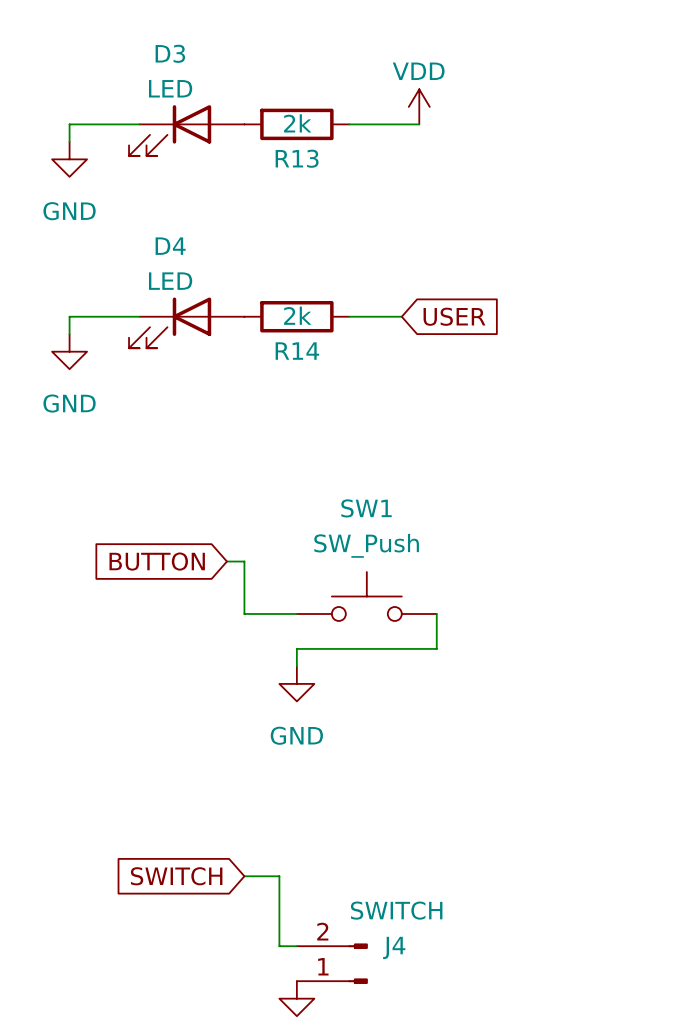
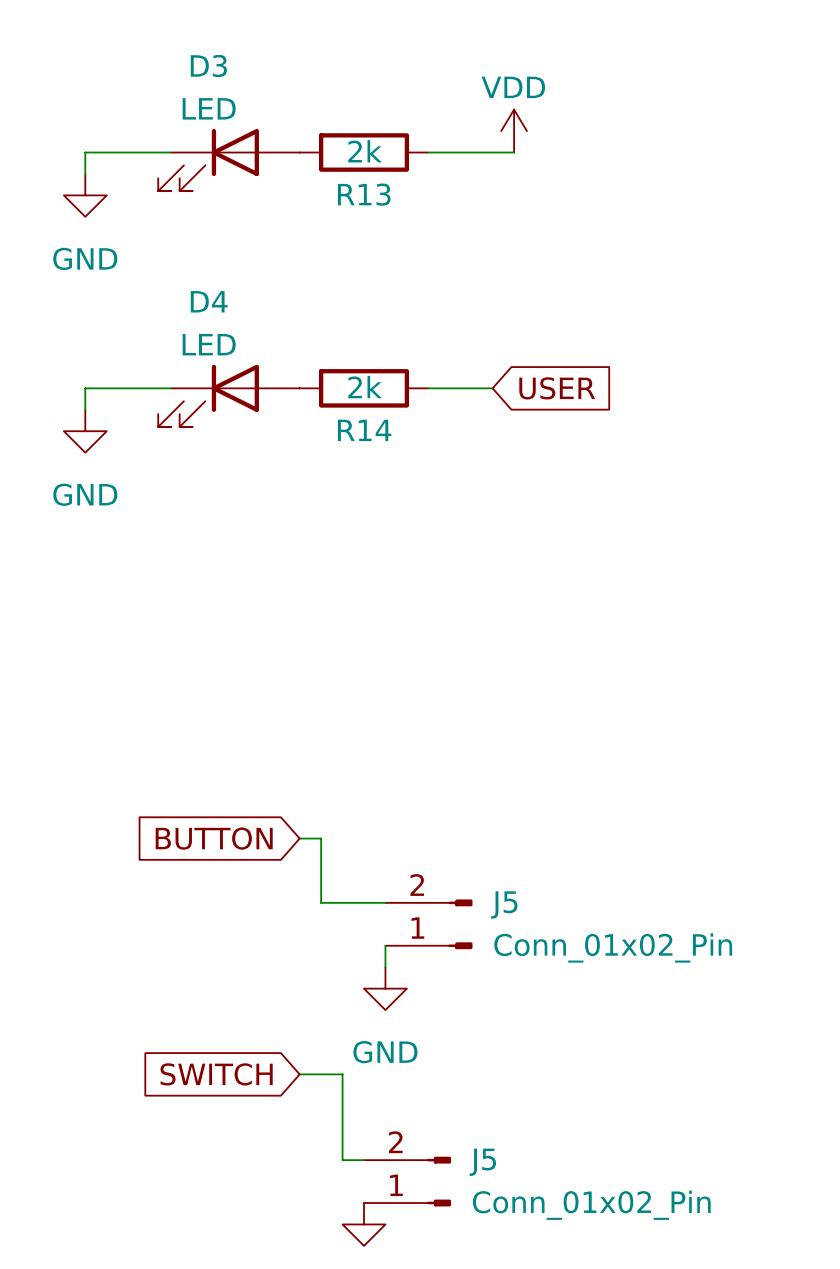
global label position: BUTTON (157, 561) -> BUTTON (214, 838)
wire: (226, 561) (244, 561) (244, 613) (296, 613) -> (299, 838) (321, 838) (321, 902) (385, 902)
SW1: SW_Push (366, 596) -> none
wire: (436, 613) (436, 648) (296, 648) (296, 666) -> none
power symbol position: GND (296, 683) -> GND (385, 988)
J5: none -> Conn_01x02_Pin (428, 924)
wire: none -> (385, 945) (385, 967)
J4 value: SWITCH (396, 910) -> Conn_01x02_Pin (591, 1205)
J4 name: J4 (394, 947) -> J5 (482, 1162)

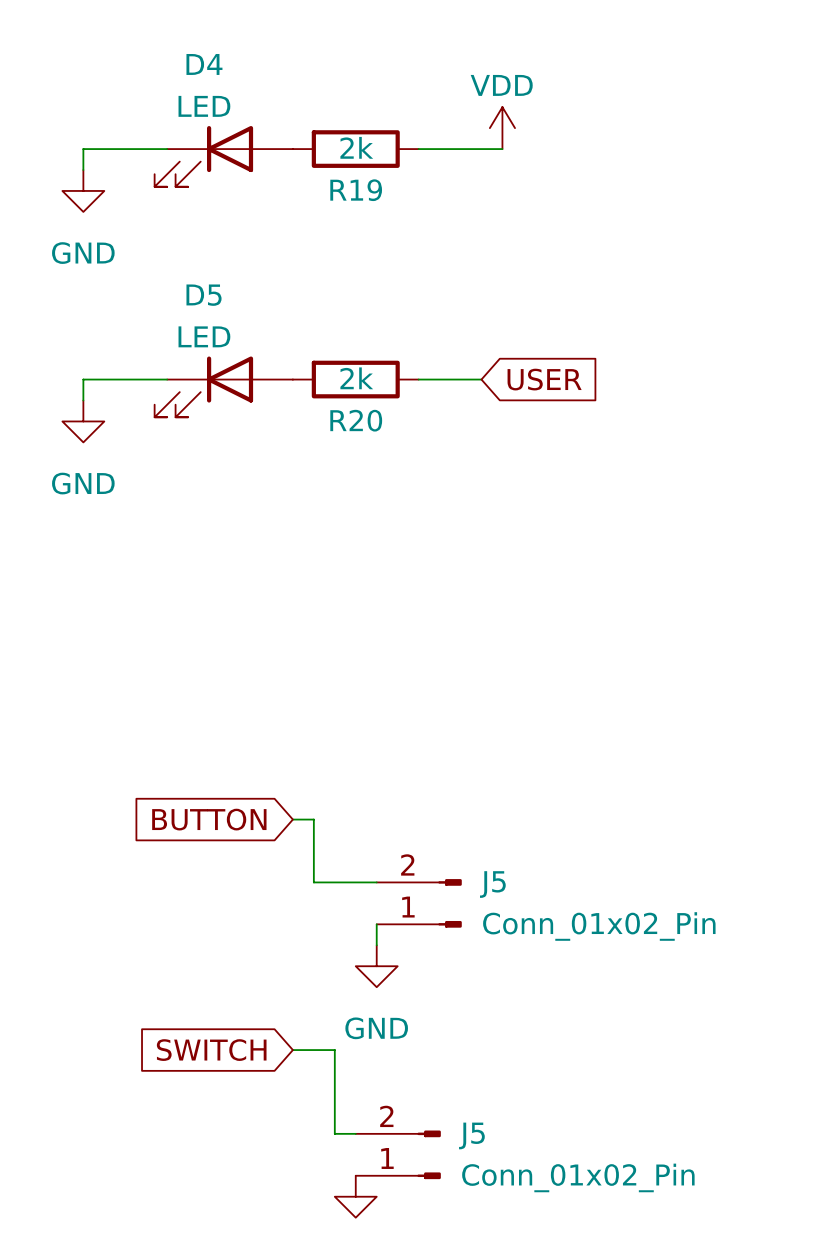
D3 name: D3 (208, 65) -> D4 (204, 64)
R13 name: R13 (364, 194) -> R19 (356, 190)
D4 name: D4 (209, 301) -> D5 (204, 295)
R14 name: R14 (364, 430) -> R20 (356, 420)

